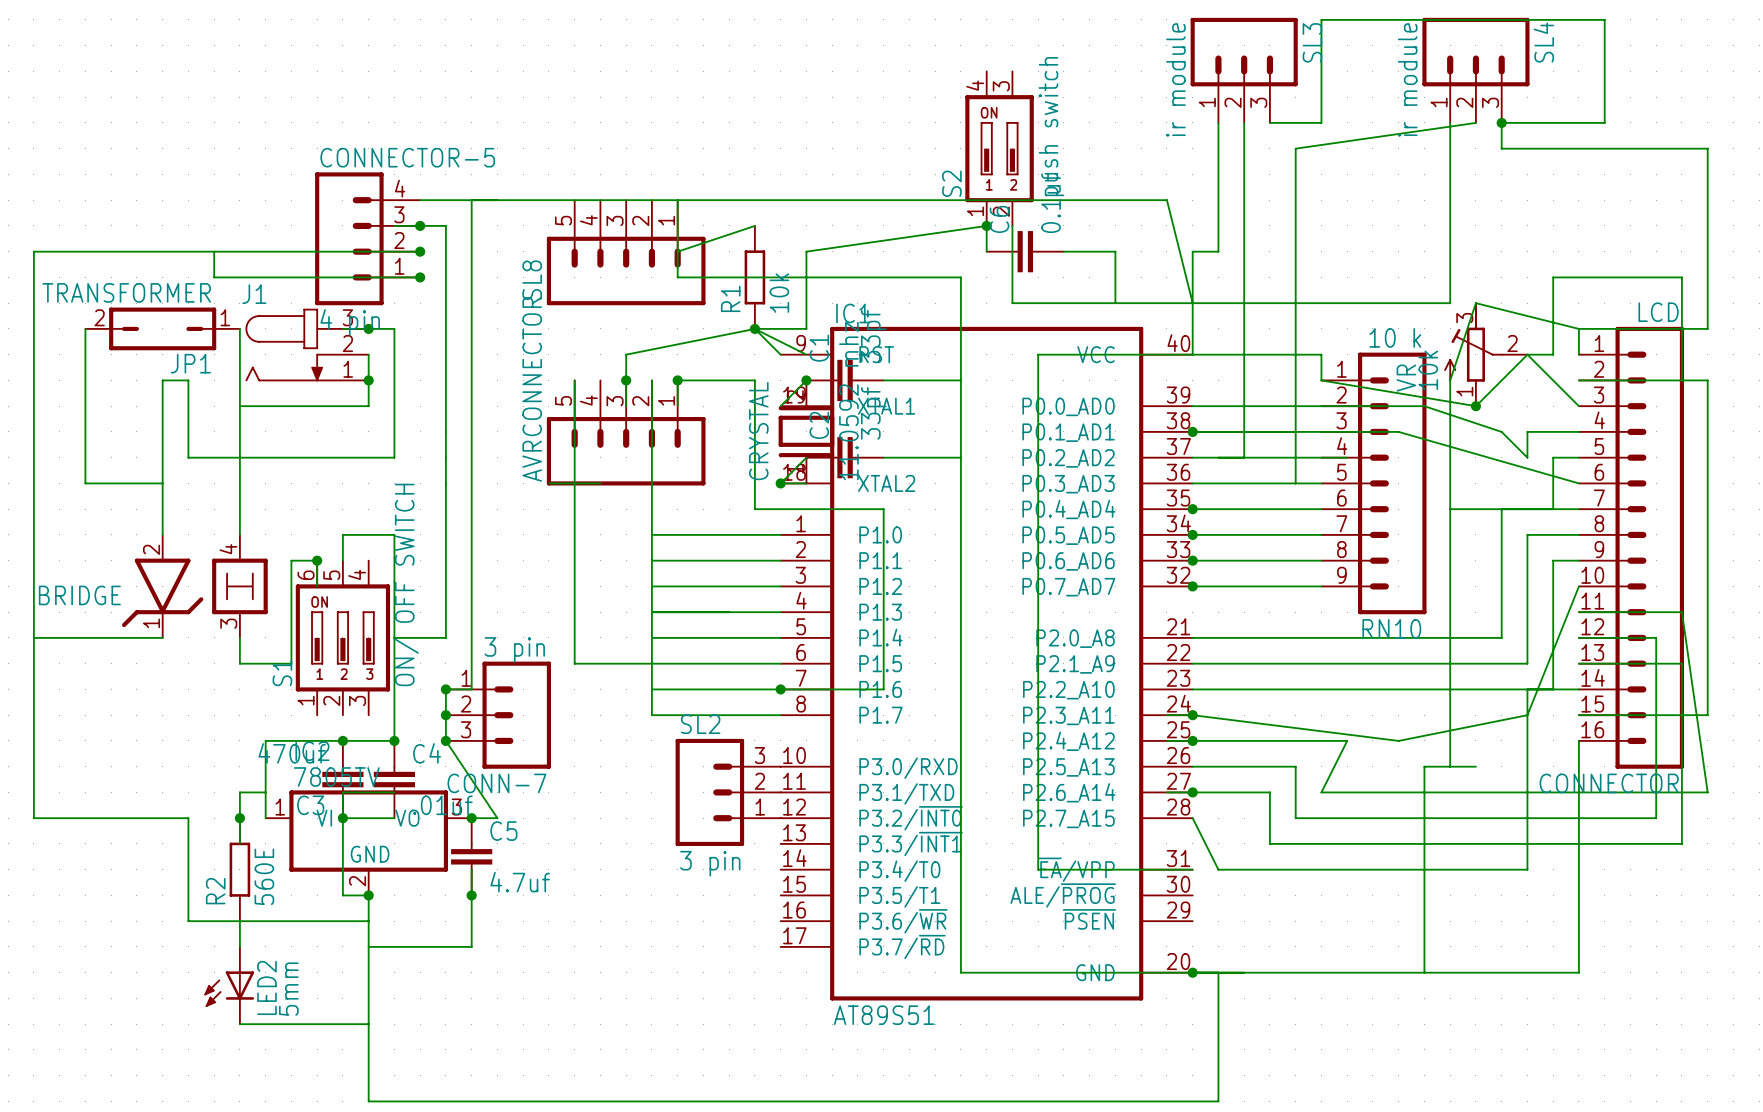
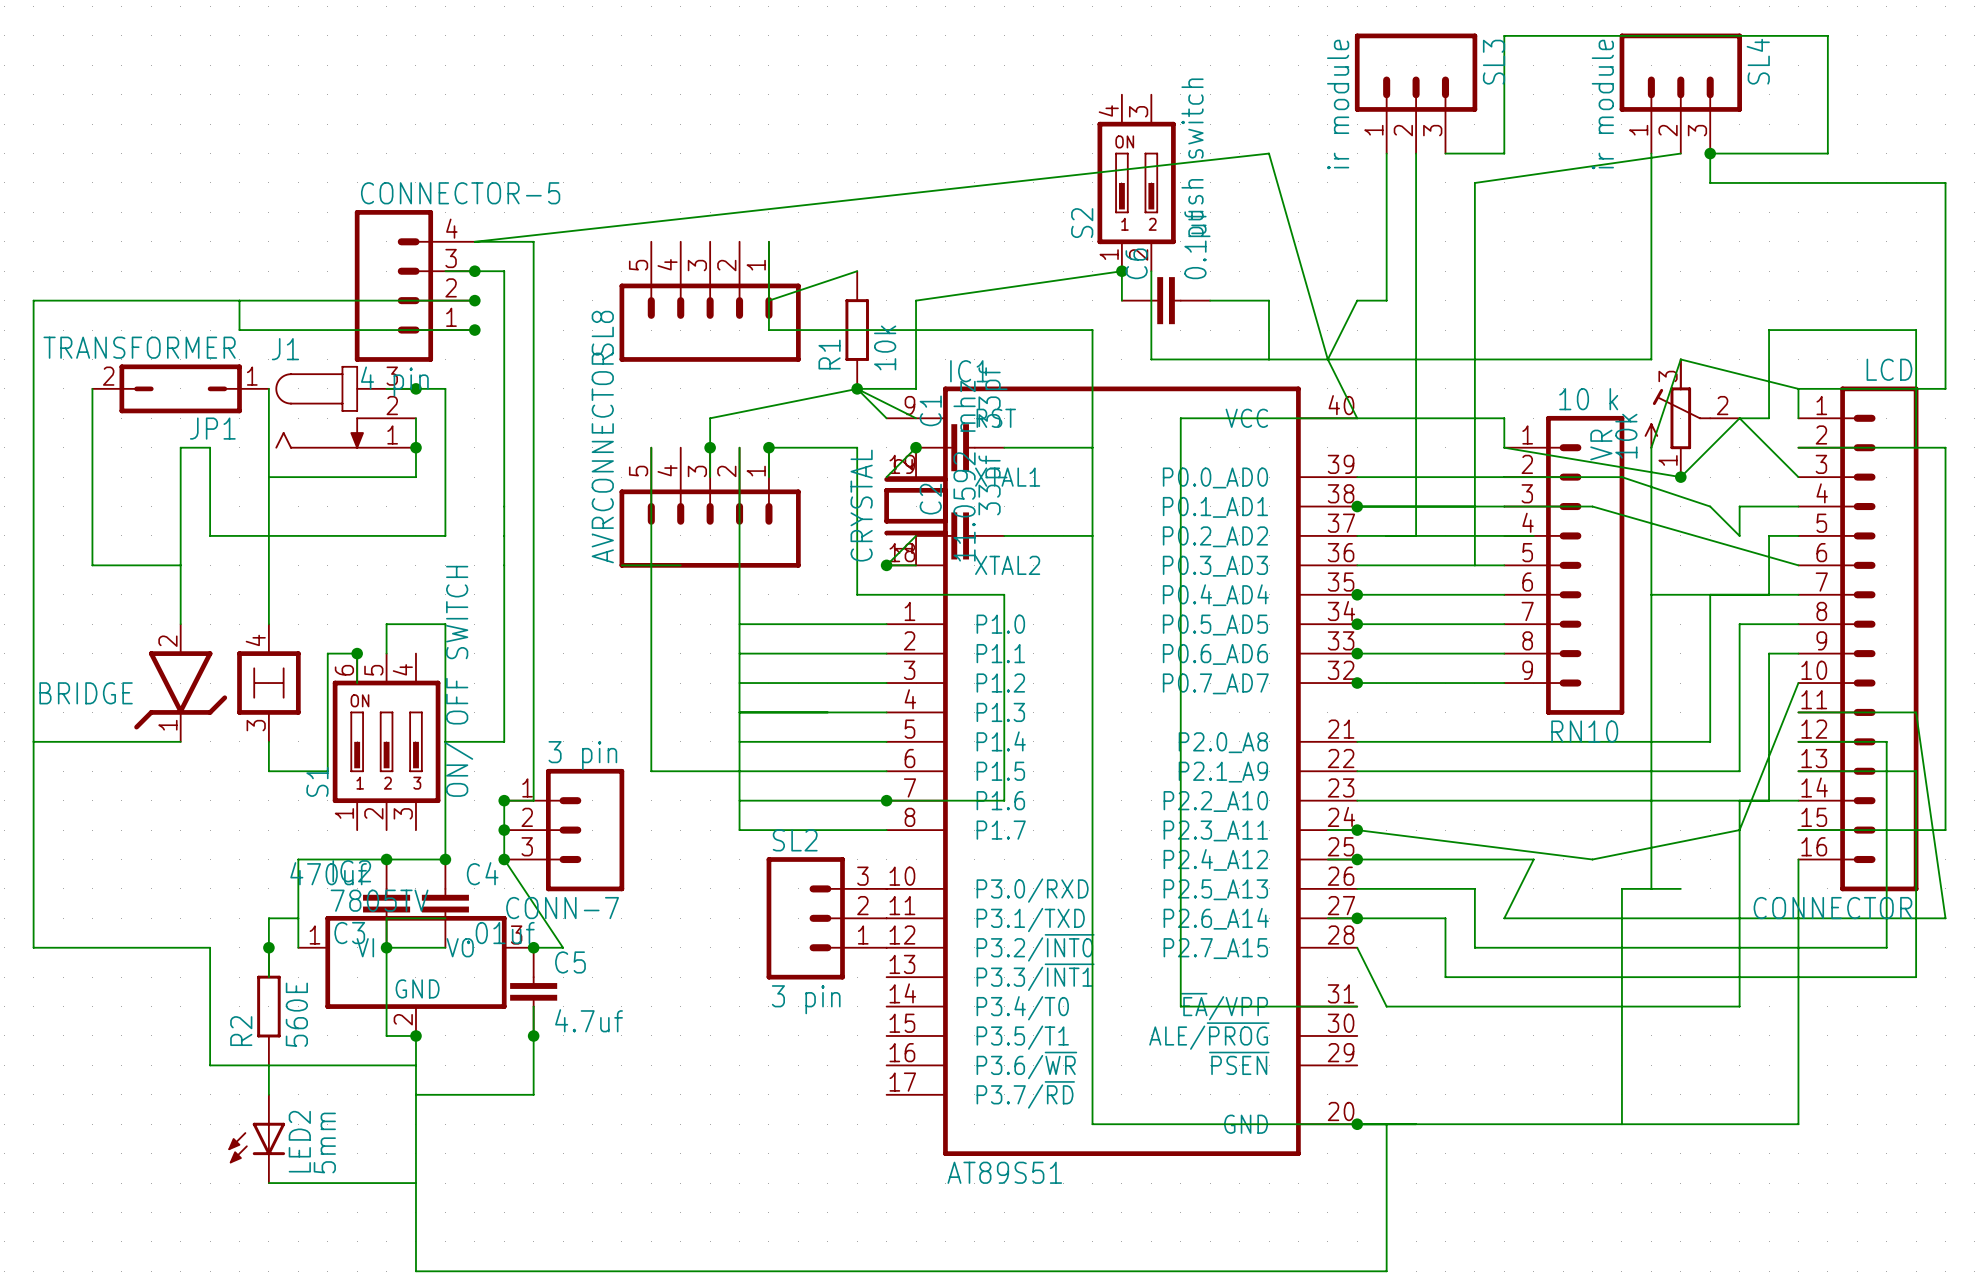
wire: none -> (474, 241) (1269, 153) (1327, 359)
wire: (471, 200) (1166, 200) (1192, 303) -> none
wire: (1192, 251) (1192, 354) -> (1327, 359) (1357, 418)
wire: none -> (1357, 300) (1327, 359)

